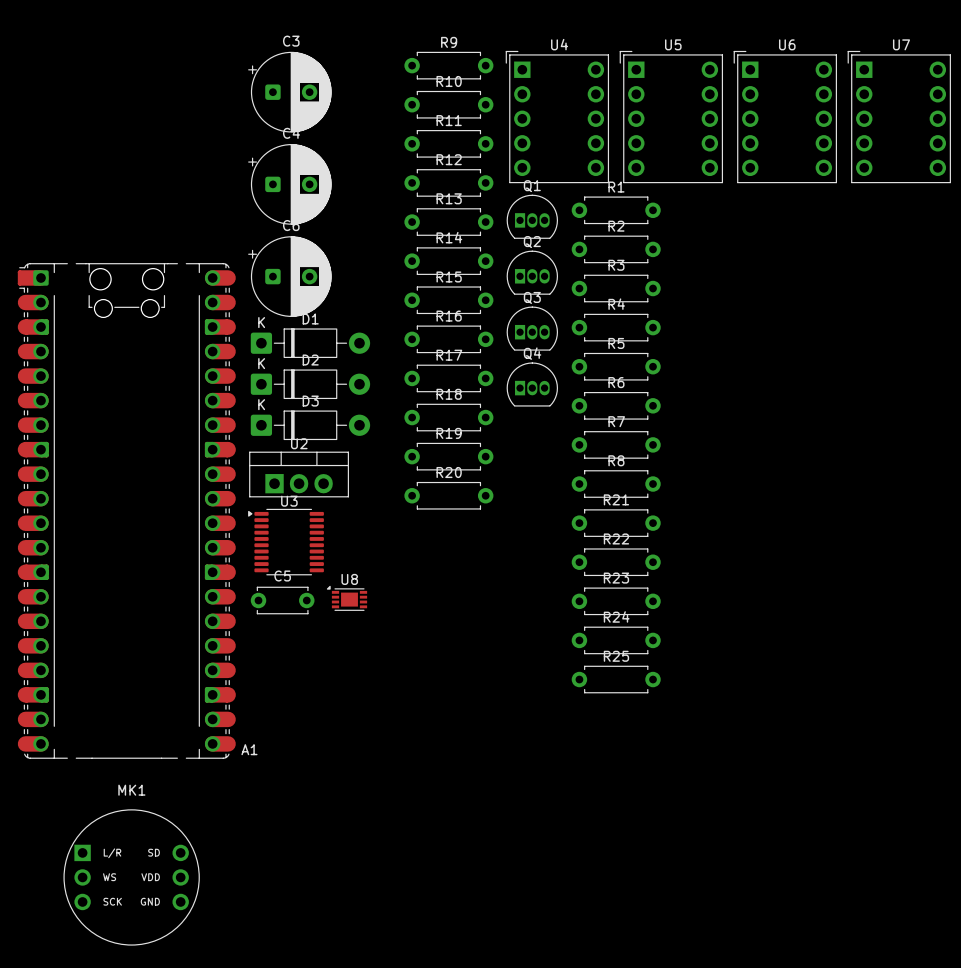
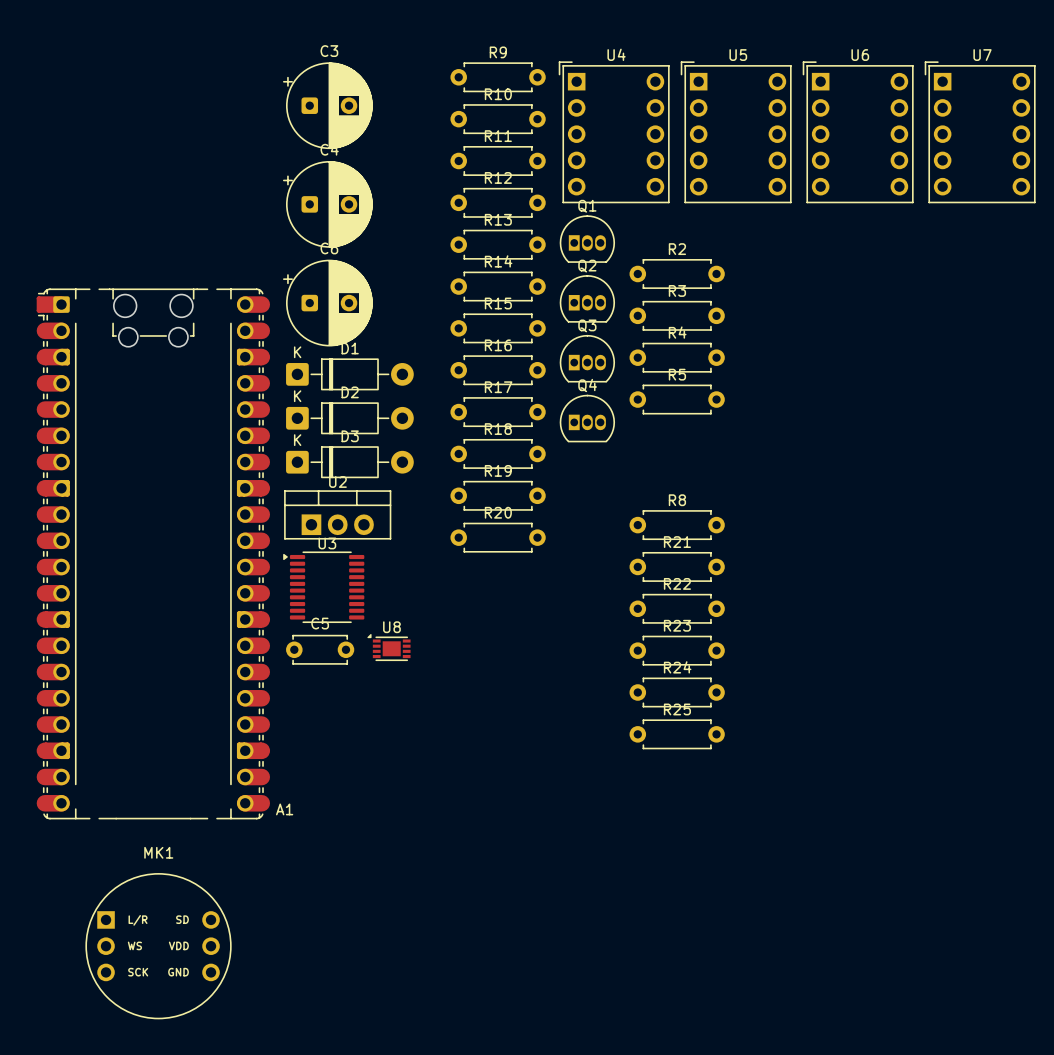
R1: (616, 210) -> none
R6: (616, 405) -> none
R7: (616, 444) -> none

